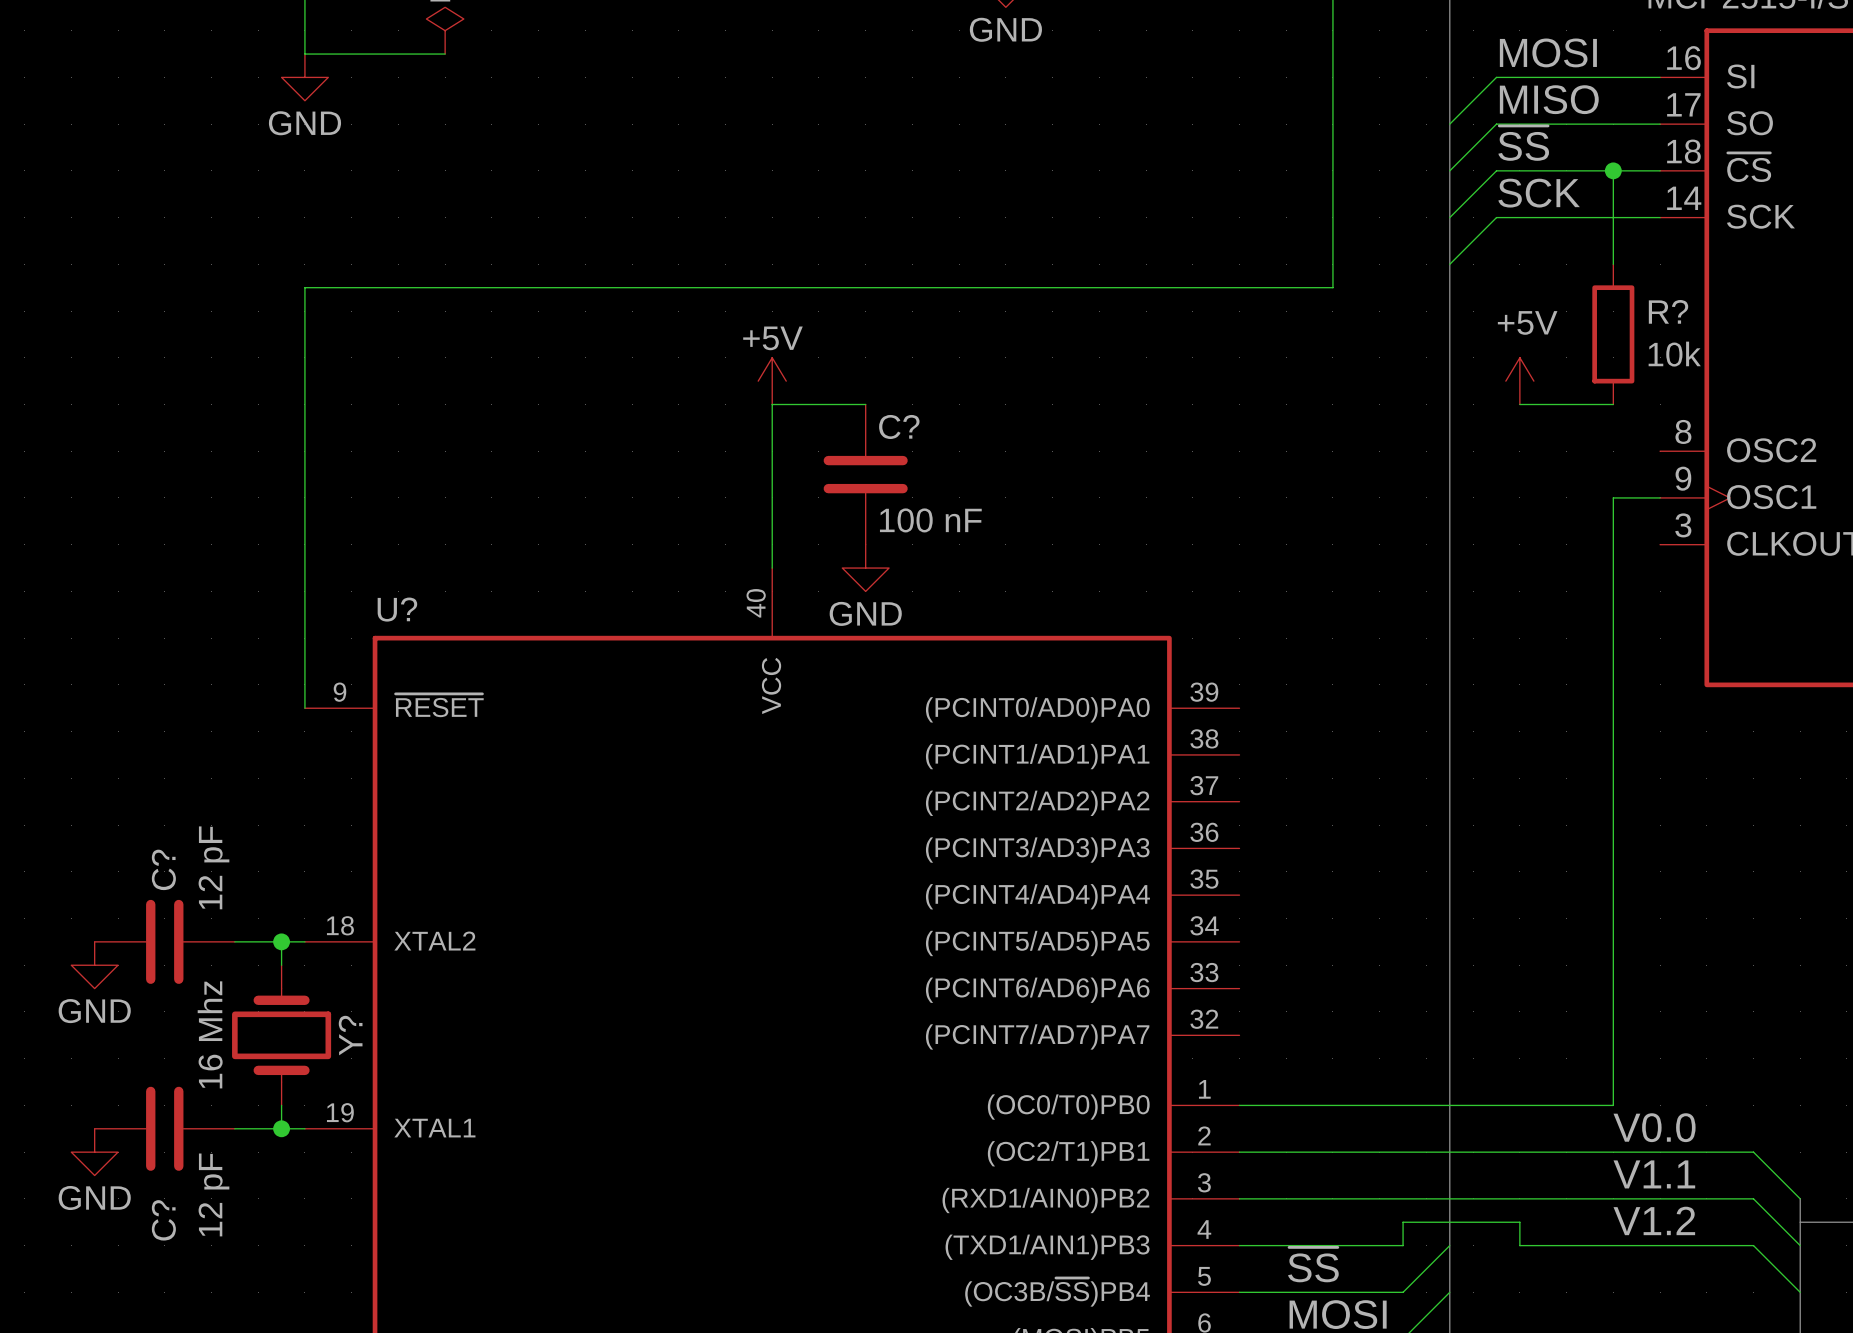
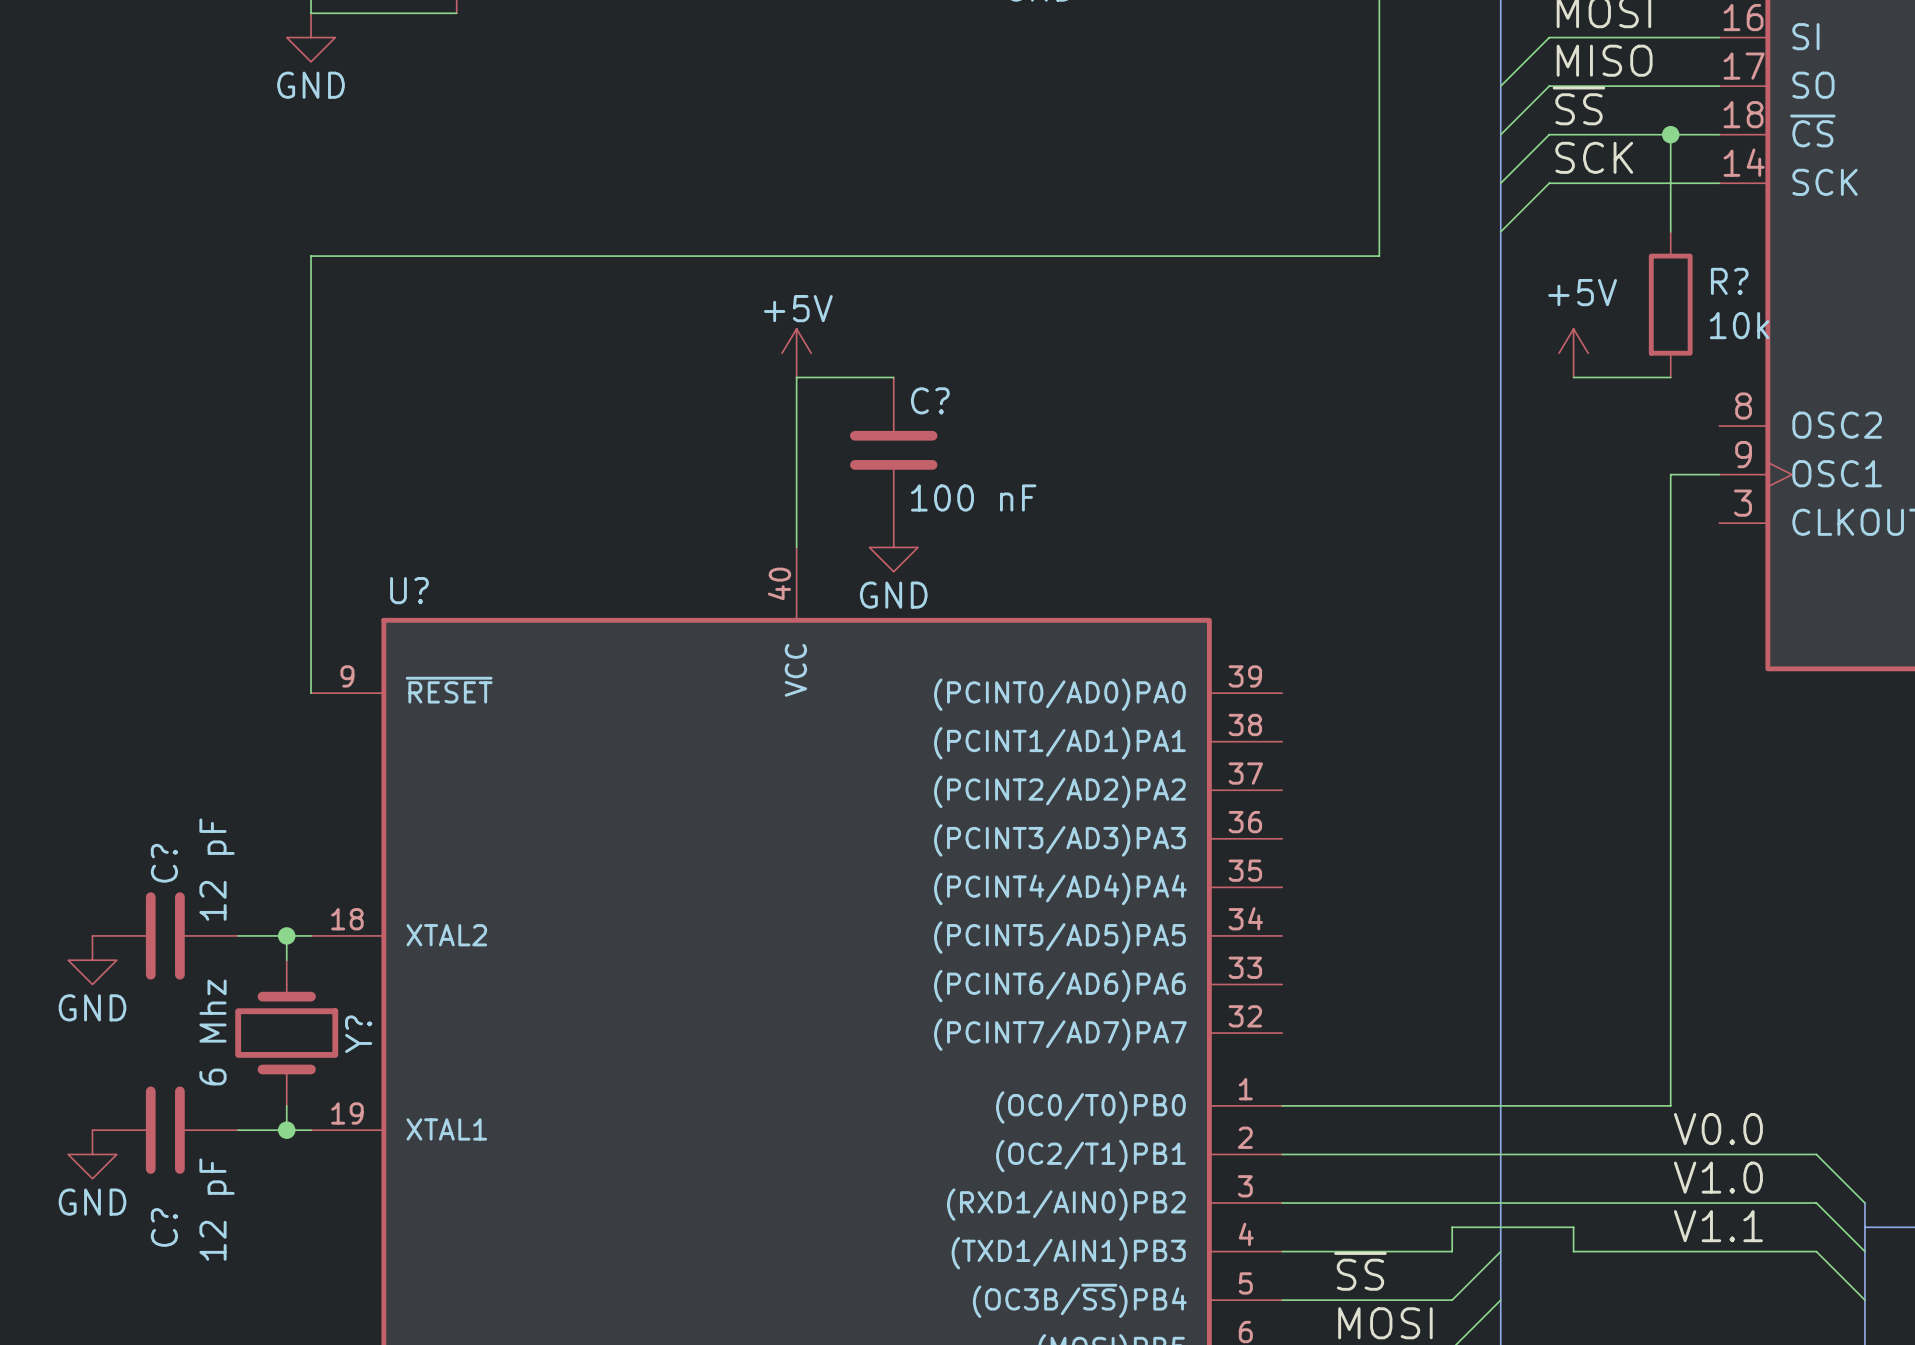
Y? value: 16 Mhz (210, 1034) -> 6 Mhz (212, 1032)
label: V1.1 (1654, 1174) -> V1.0 (1718, 1177)
label: V1.2 (1654, 1220) -> V1.1 (1718, 1226)

